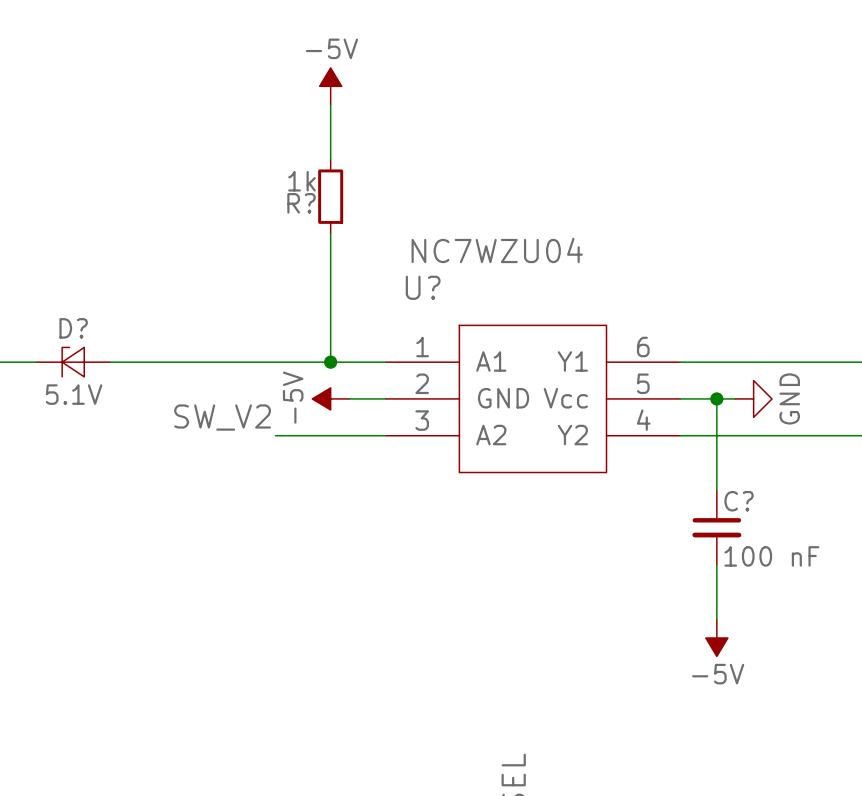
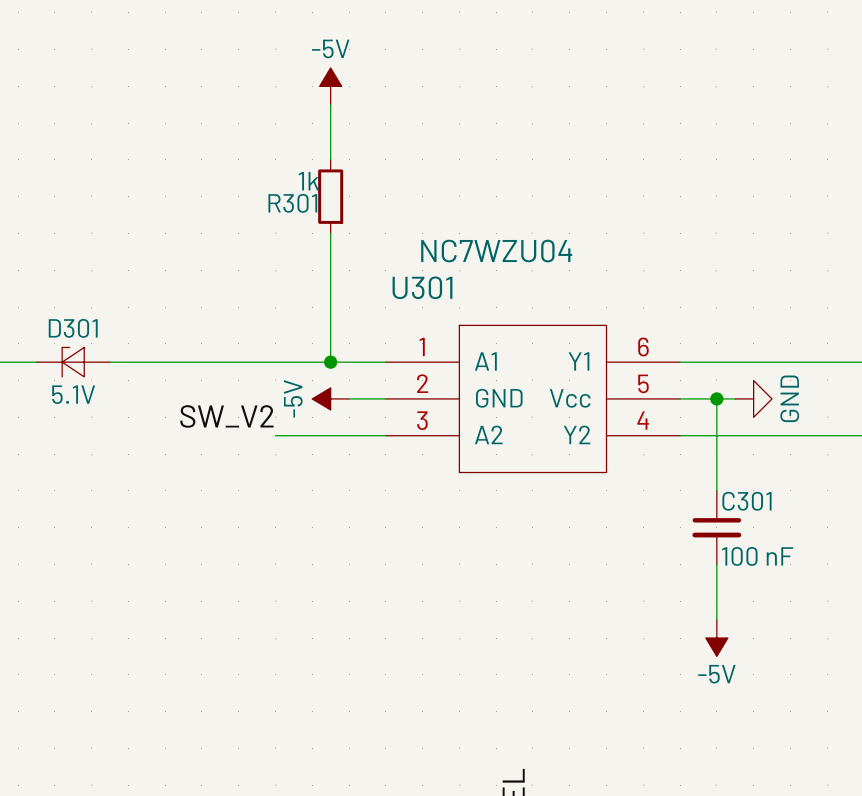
R? name: R? (301, 203) -> R301 (292, 203)
U? name: U? (423, 287) -> U301 (422, 287)
D? name: D? (73, 328) -> D301 (73, 328)
C? name: C? (739, 501) -> C301 (747, 501)

